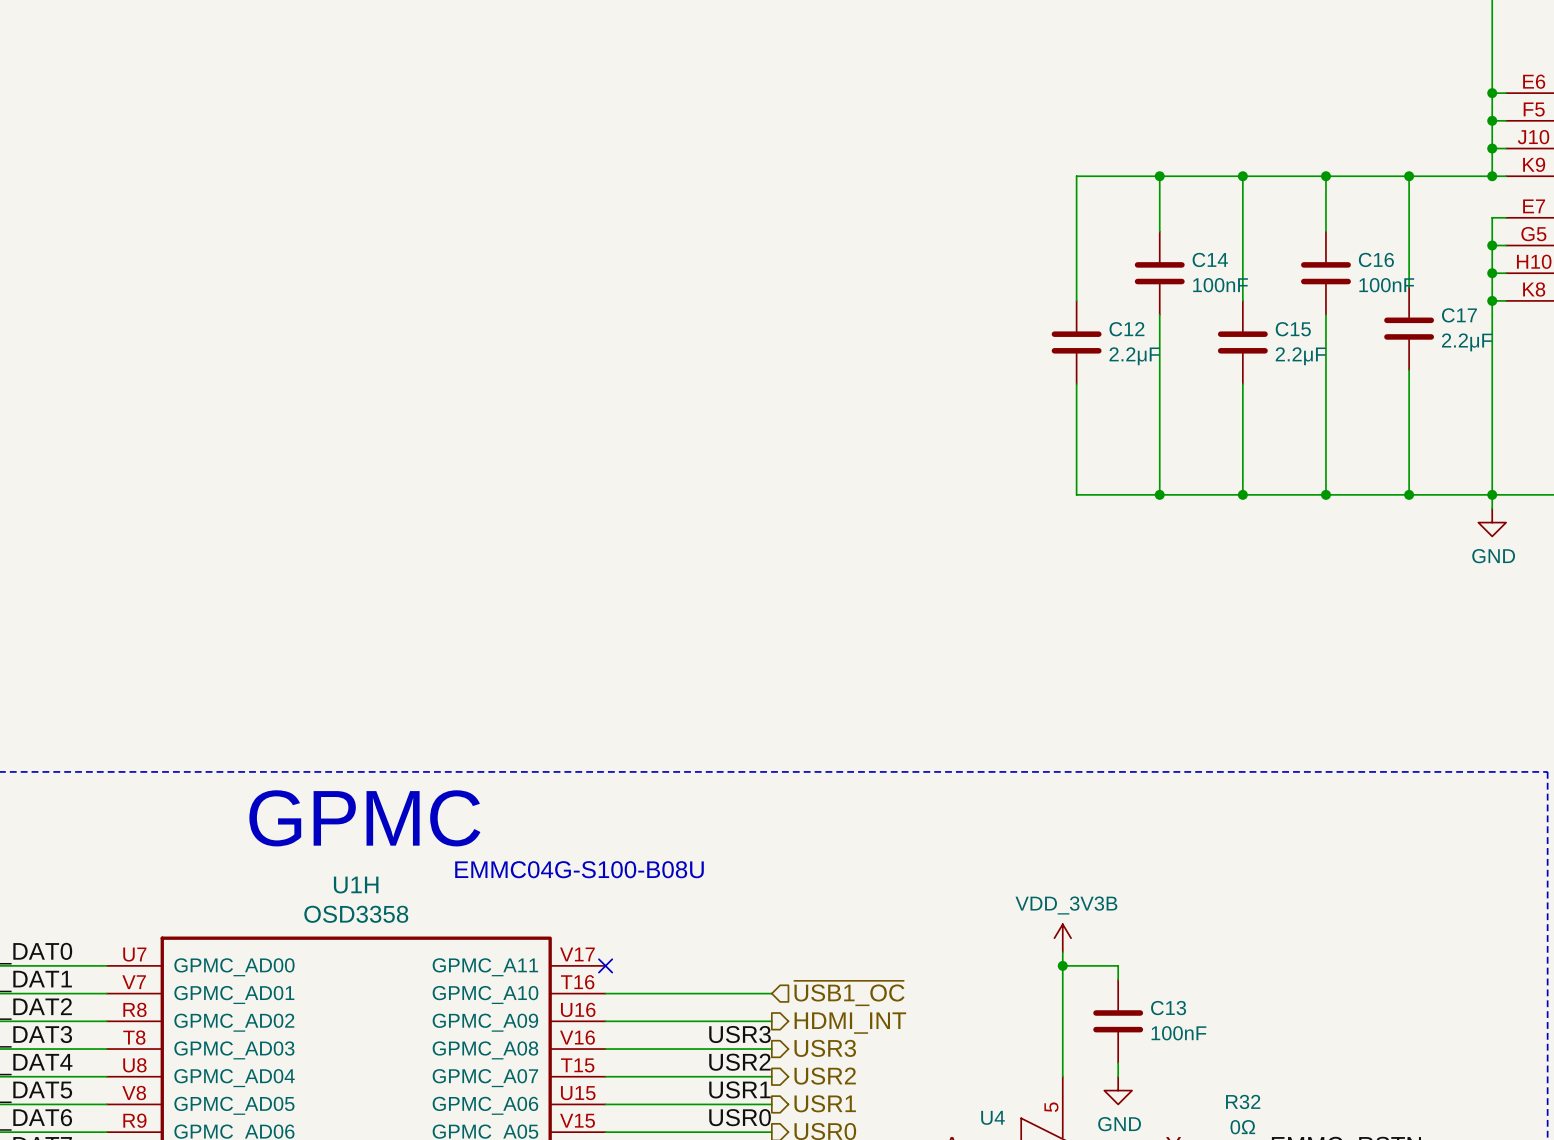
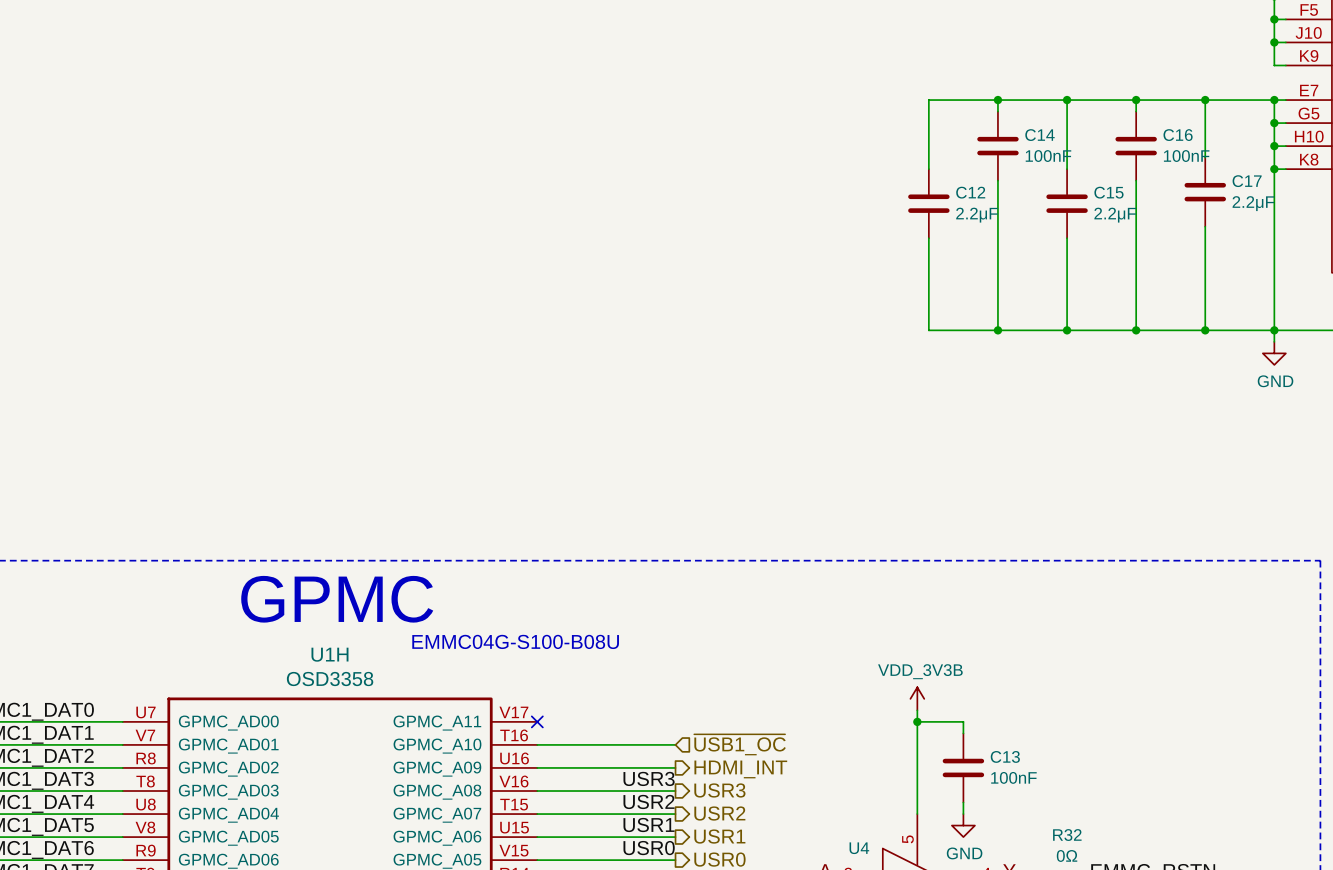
wire: (1159, 176) (1159, 217) -> none
junction position: (1159, 176) -> (997, 100)
wire: (1242, 176) (1242, 217) -> none
junction position: (1242, 176) -> (1067, 100)
wire: (1325, 176) (1325, 217) -> none
junction position: (1325, 176) -> (1136, 100)
wire: (1409, 176) (1409, 217) -> none
junction position: (1409, 176) -> (1205, 100)
wire: (1492, 176) (1076, 176) (1076, 217) -> (1274, 100) (928, 100)
junction position: (1492, 176) -> (1274, 100)

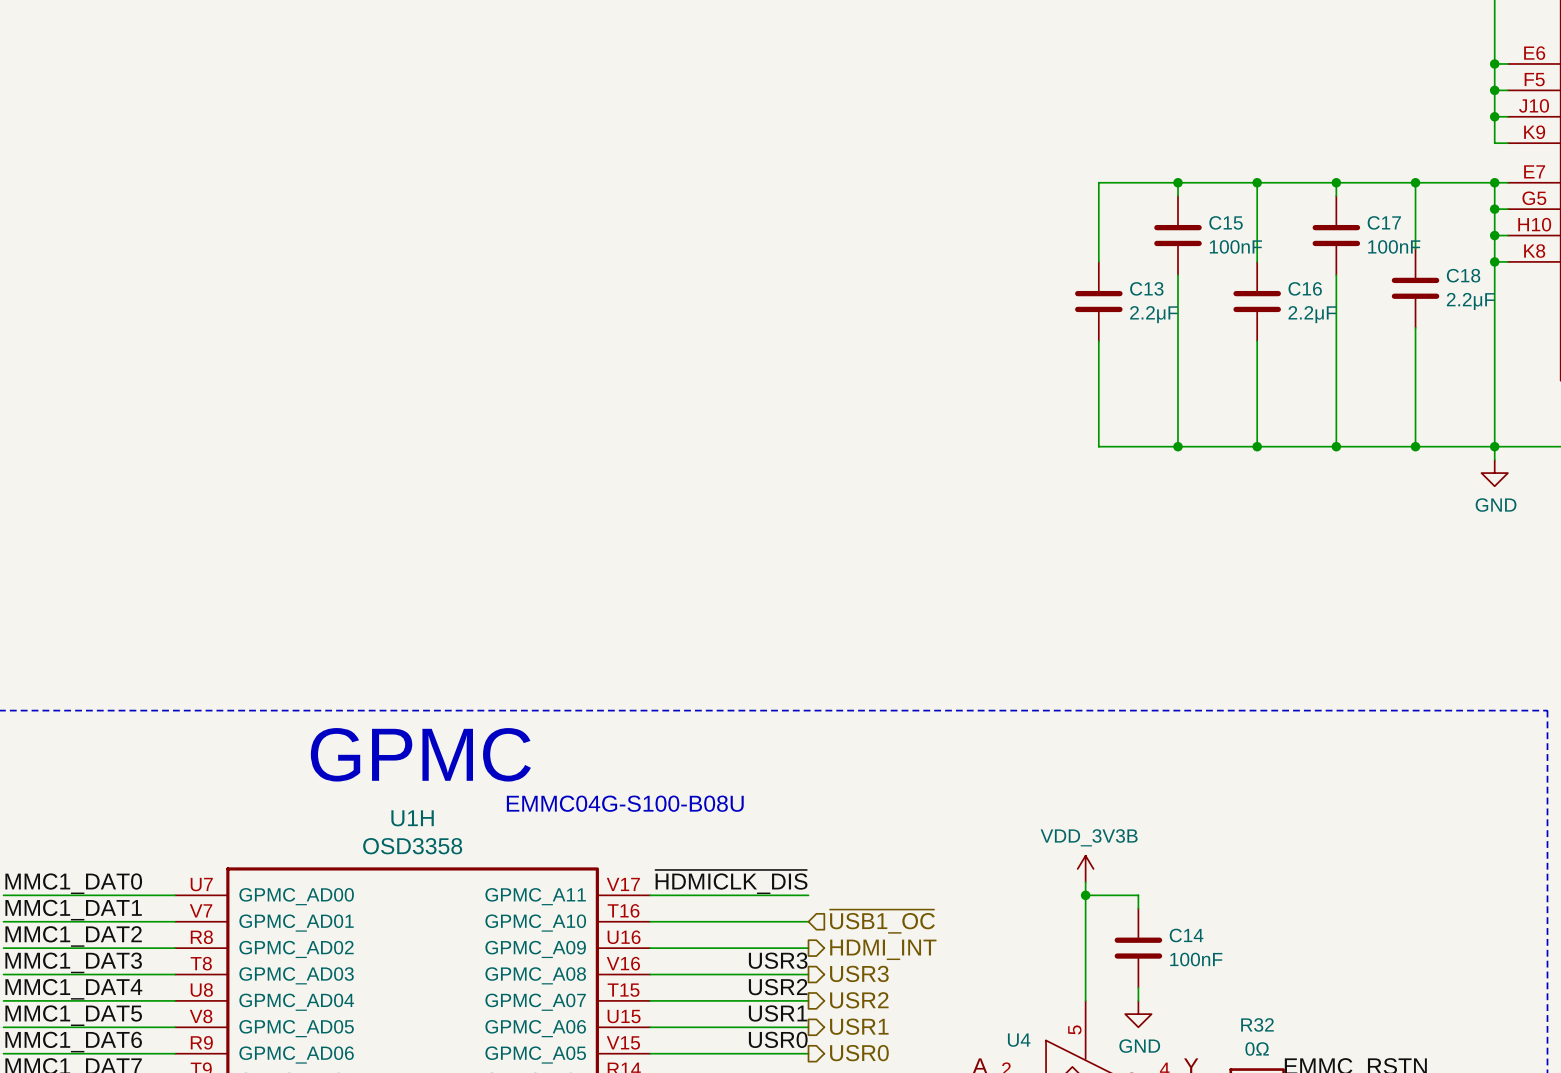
C14 name: C14 (1039, 135) -> C15 (1226, 222)
C16 name: C16 (1178, 135) -> C17 (1384, 222)
C17 name: C17 (1247, 181) -> C18 (1463, 275)
C12 name: C12 (970, 192) -> C13 (1146, 288)
C15 name: C15 (1108, 192) -> C16 (1305, 288)
label: none -> ~{HDMICLK_DIS} (731, 882)
wire: none -> (650, 895) (808, 895)
no-connect mark: (537, 721) -> none
C13 name: C13 (1005, 756) -> C14 (1186, 935)

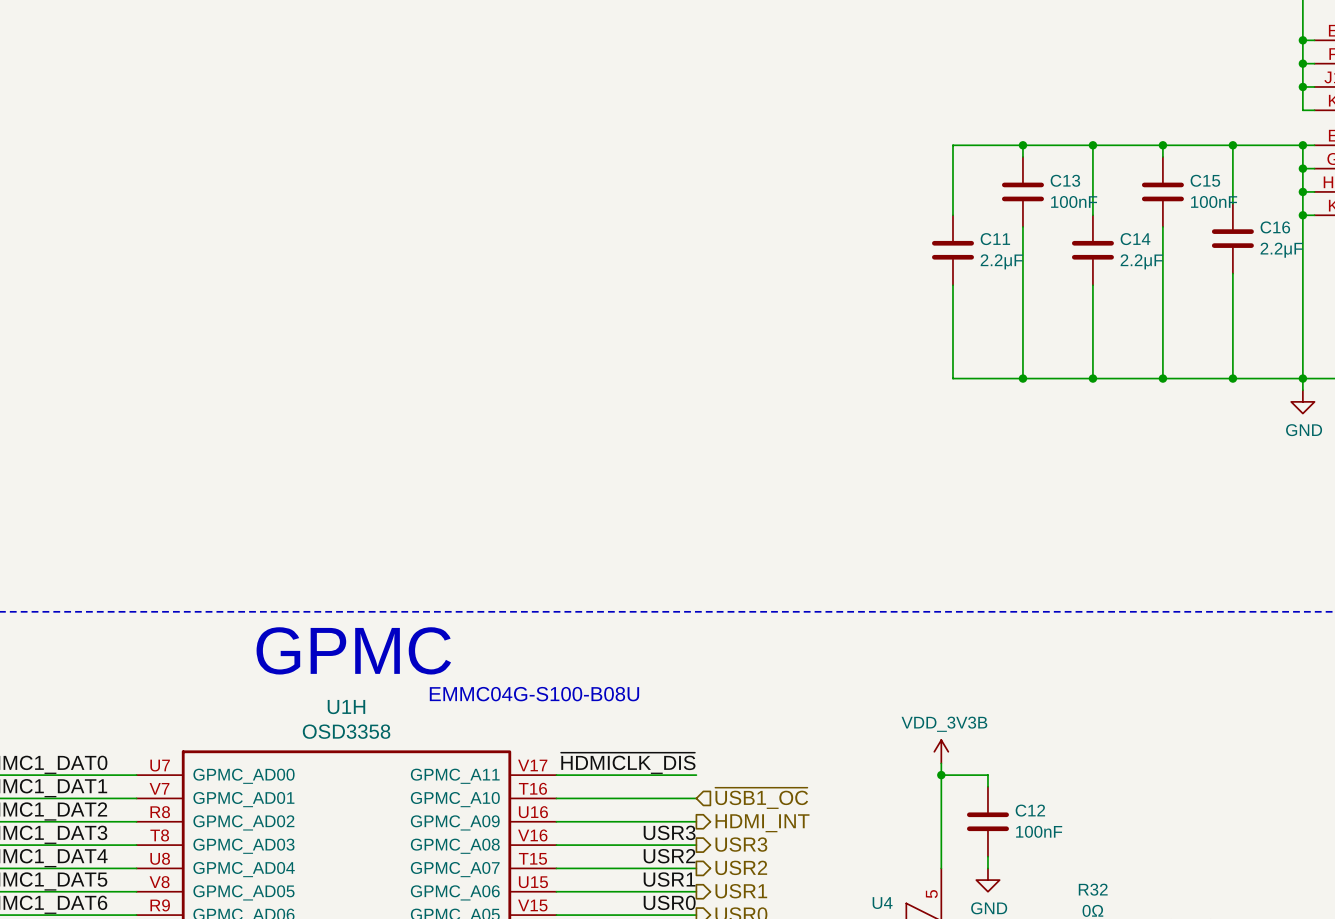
C15 name: C15 (1226, 222) -> C13 (1065, 180)
C17 name: C17 (1384, 222) -> C15 (1205, 180)
C18 name: C18 (1463, 275) -> C16 (1275, 227)
C13 name: C13 (1146, 288) -> C11 (995, 239)
C16 name: C16 (1305, 288) -> C14 (1135, 239)
C14 name: C14 (1186, 935) -> C12 (1030, 810)

